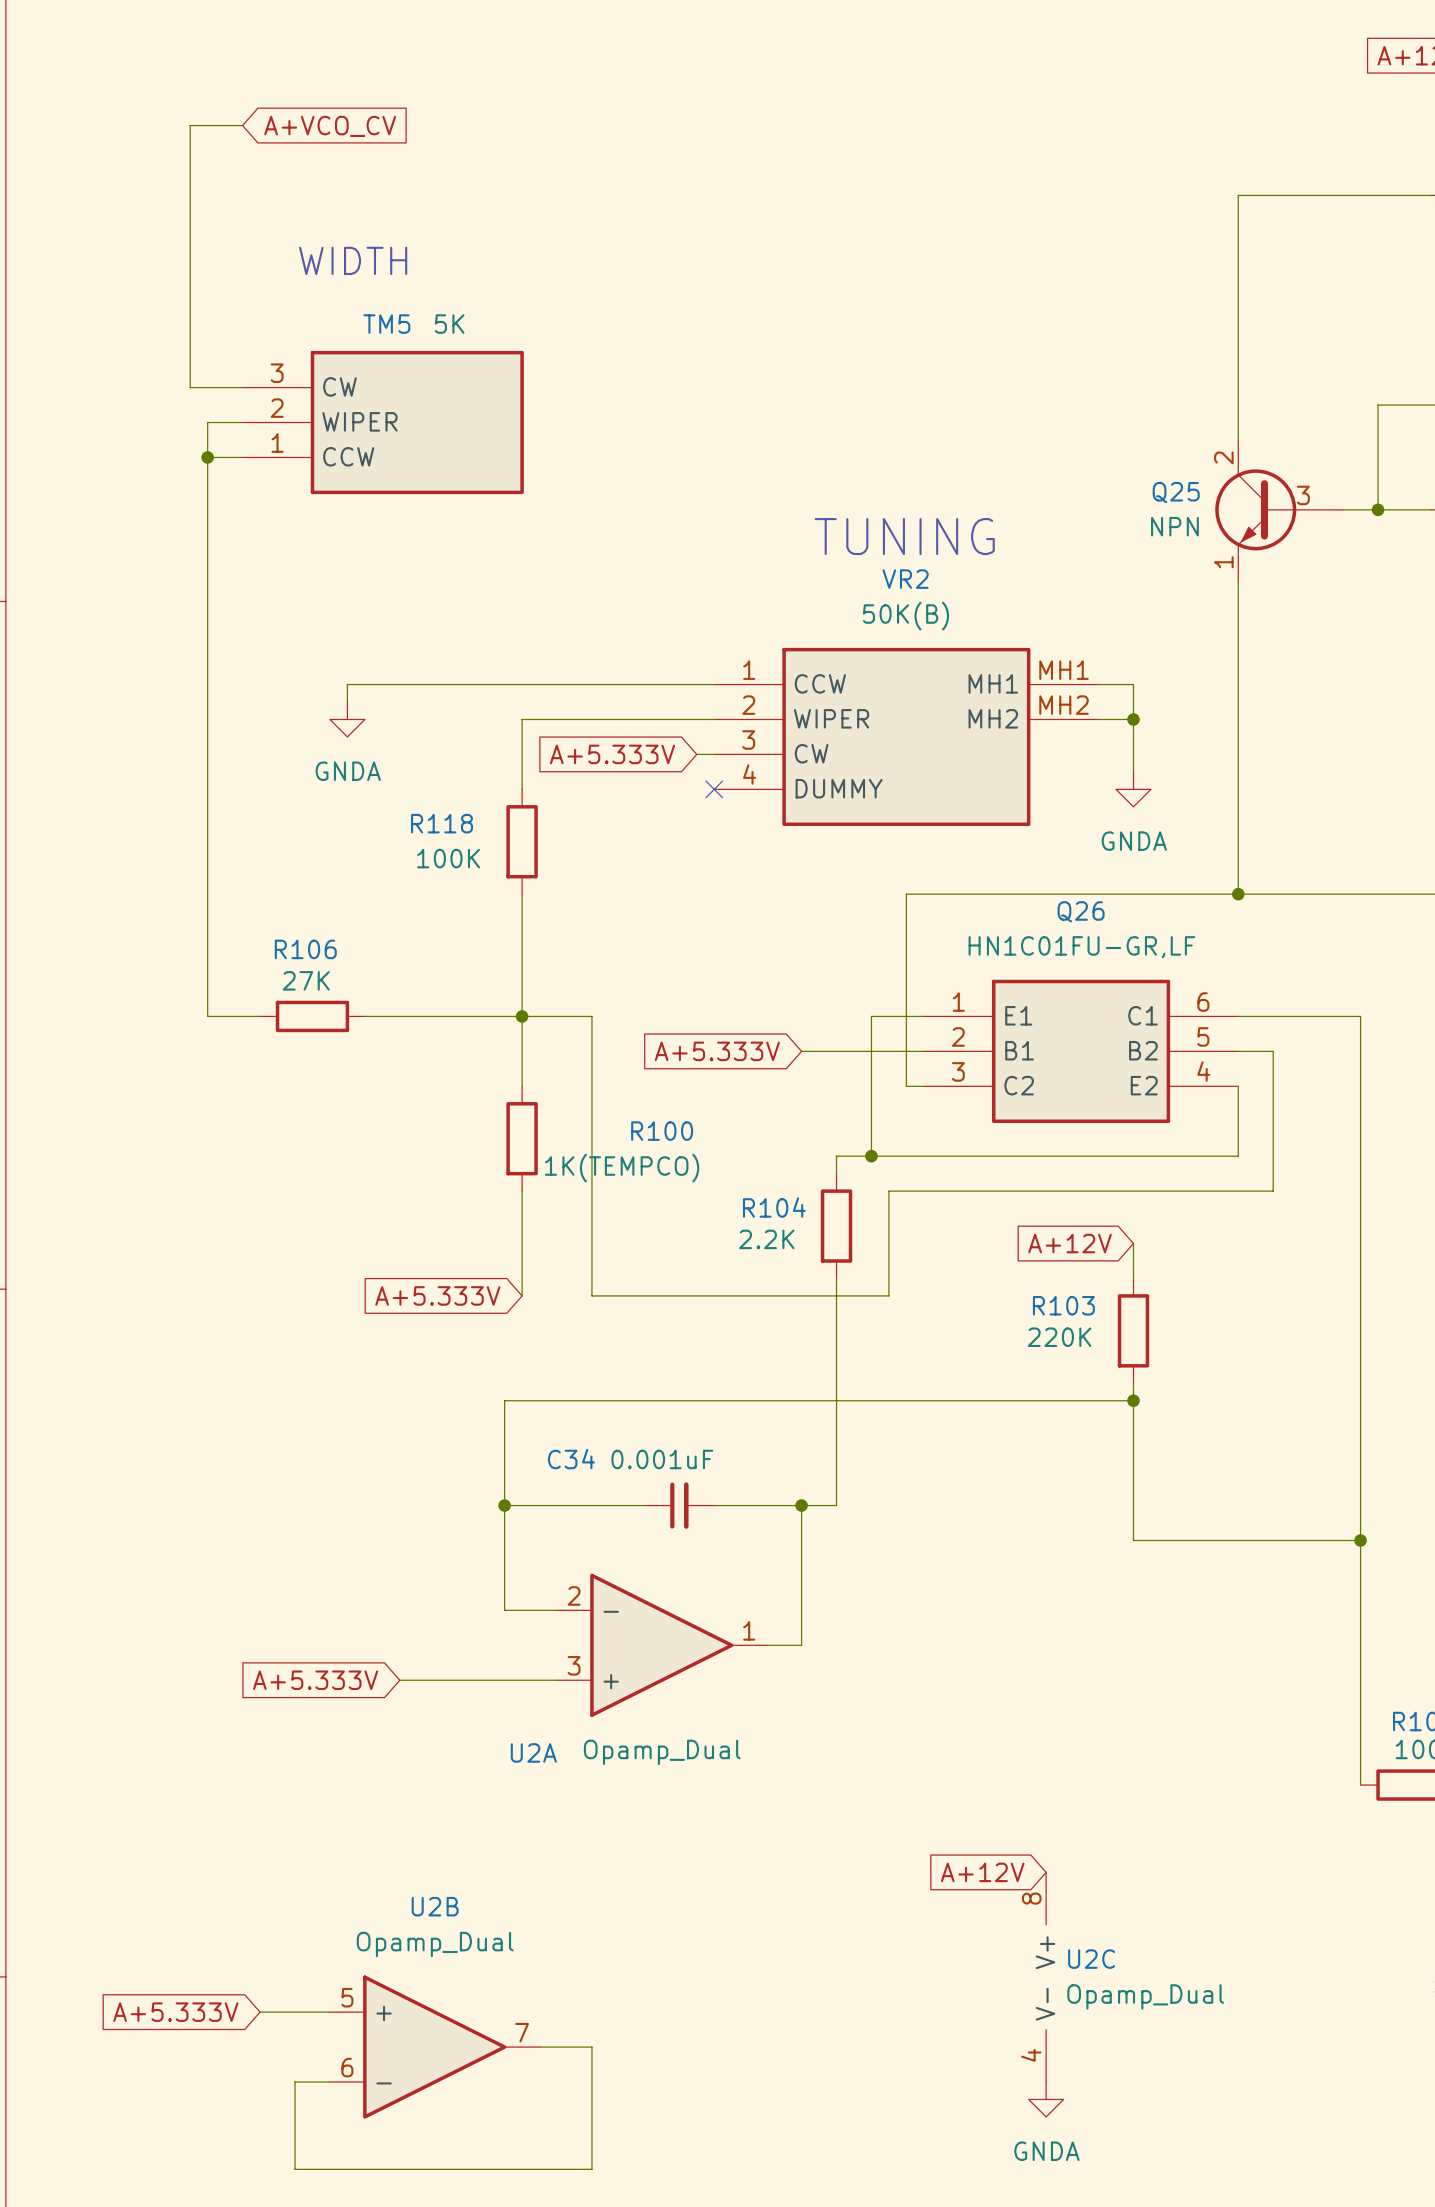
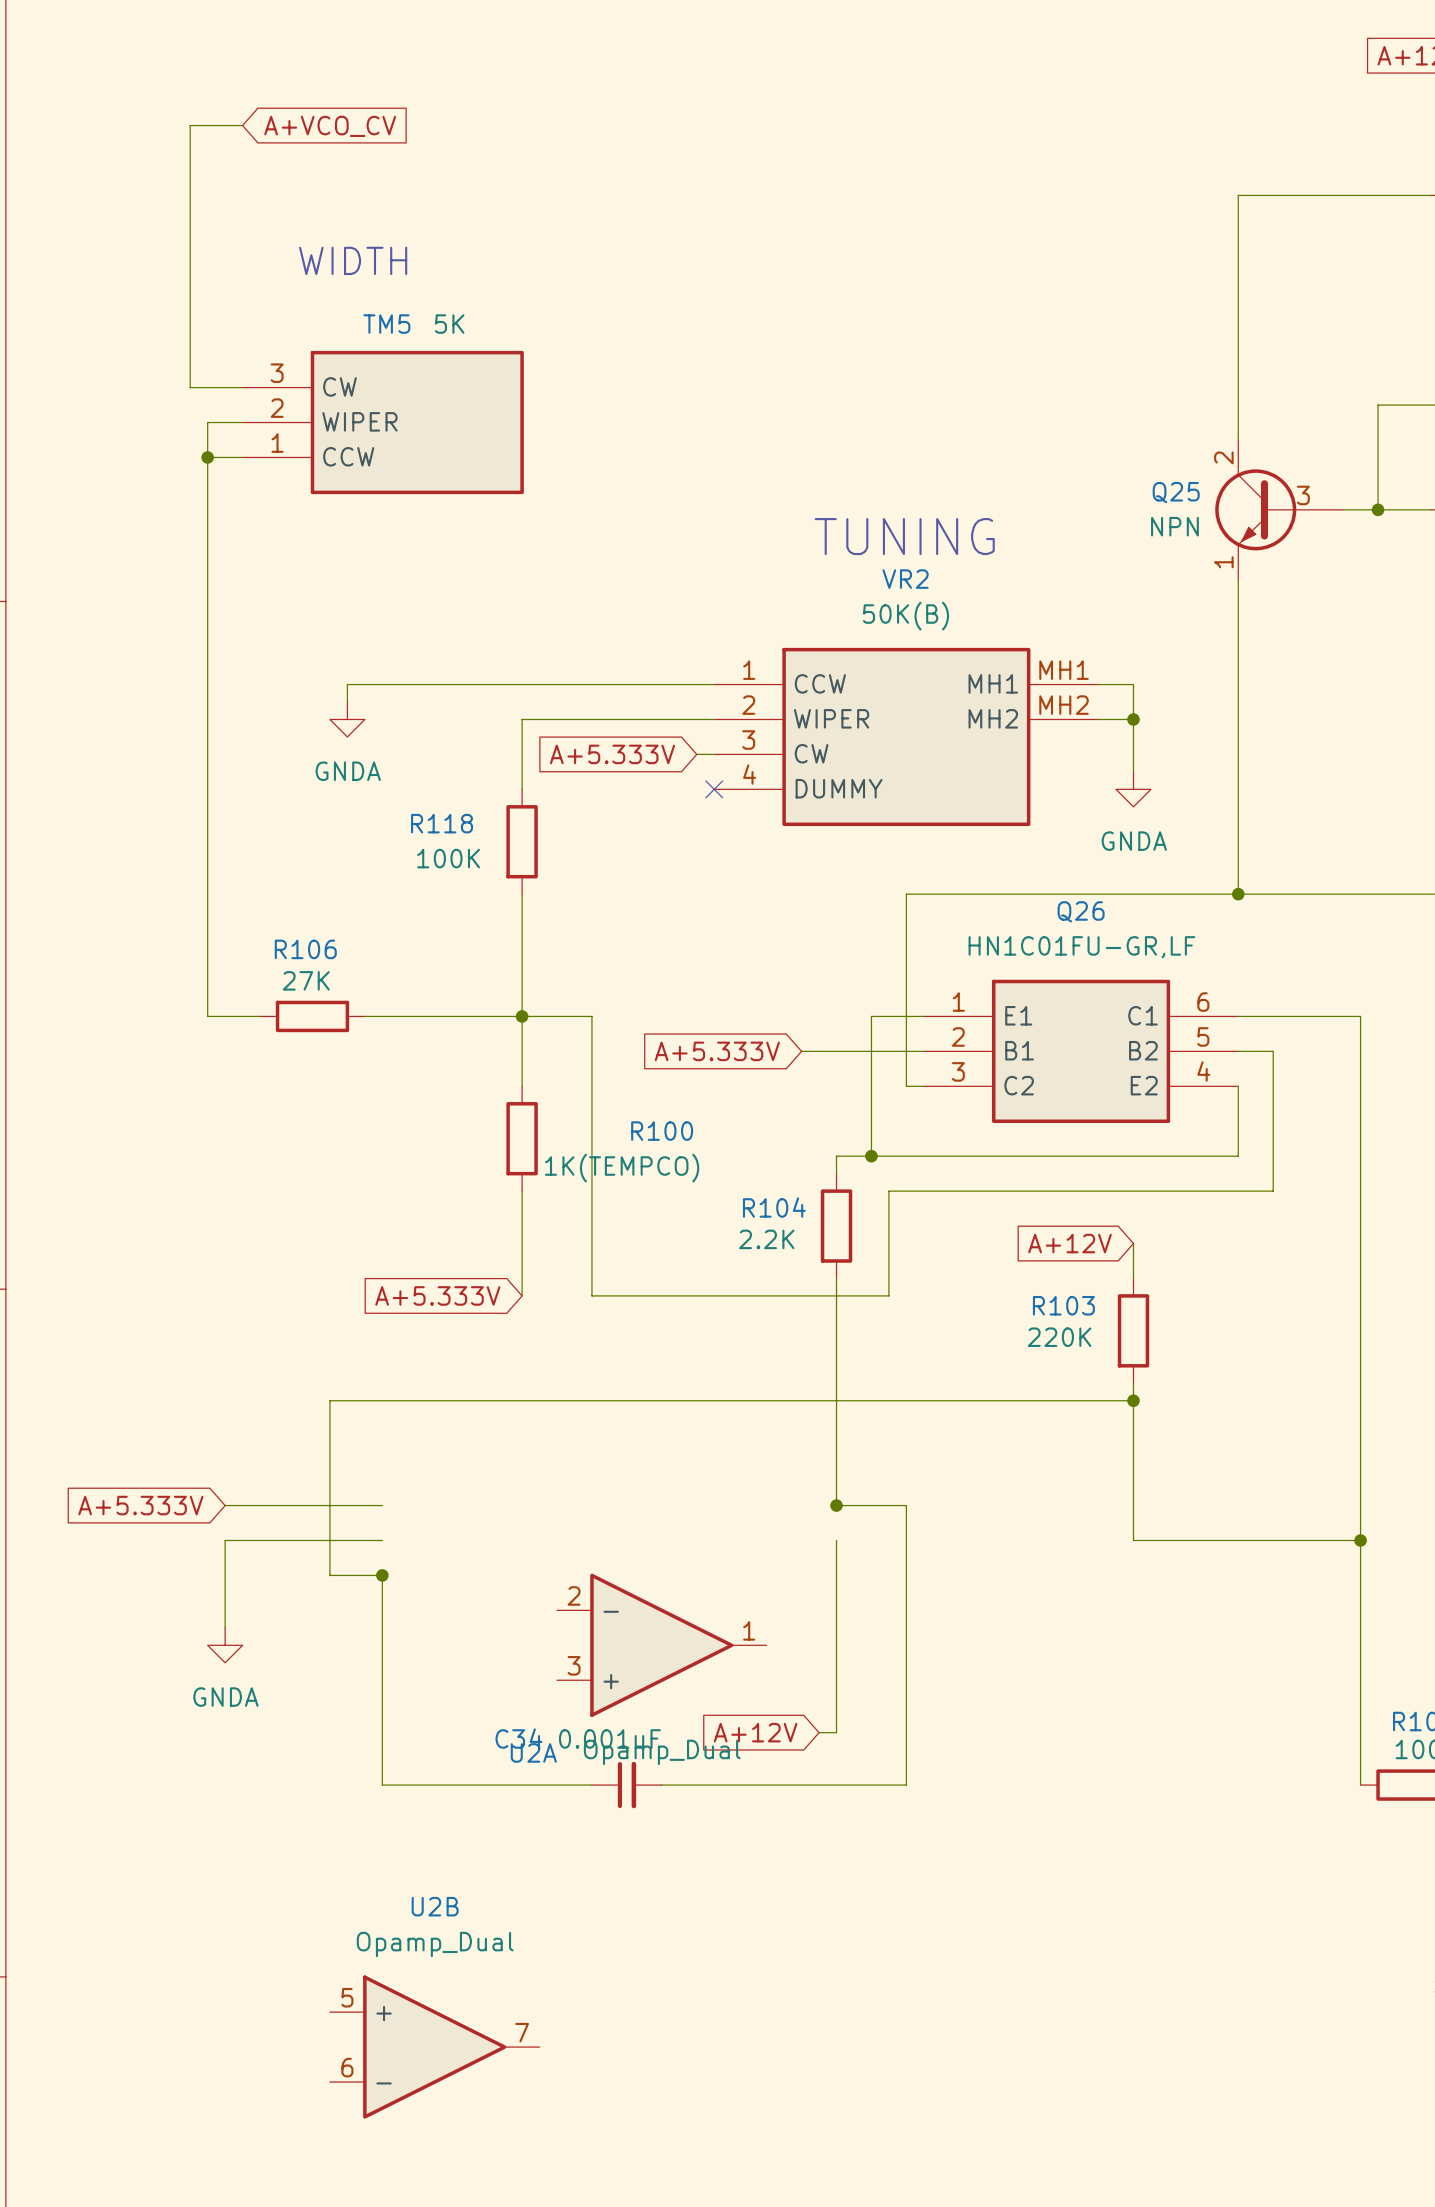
wire: (504, 1400) (504, 1610) (557, 1610) -> (504, 1400) (329, 1400) (329, 1575) (382, 1575) (382, 1785) (591, 1785)
wire: (504, 1505) (644, 1505) -> none
junction: (504, 1505) -> none
C34 position: (679, 1505) -> (626, 1785)
wire: (714, 1505) (836, 1505) -> (661, 1785) (906, 1785) (906, 1505) (836, 1505)
wire: (801, 1505) (801, 1645) (766, 1645) -> none
junction position: (801, 1505) -> (836, 1505)
wire: none -> (382, 1540) (225, 1540) (225, 1627)
wire: none -> (836, 1540) (836, 1732) (819, 1732)
junction: none -> (382, 1575)
power symbol: none -> GNDA (225, 1645)
global label position: A+5.333V (315, 1680) -> A+5.333V (140, 1505)
wire: (399, 1680) (557, 1680) -> (225, 1505) (382, 1505)
global label position: A+12V (982, 1872) -> A+12V (755, 1732)
U2C: Opamp_Dual (1046, 1977) -> none
global label: A+5.333V (175, 2012) -> none
wire: (260, 2012) (329, 2012) -> none
wire: (539, 2047) (591, 2047) (591, 2169) (295, 2169) (295, 2082) (329, 2082) -> none
power symbol: GNDA (1046, 2099) -> none

